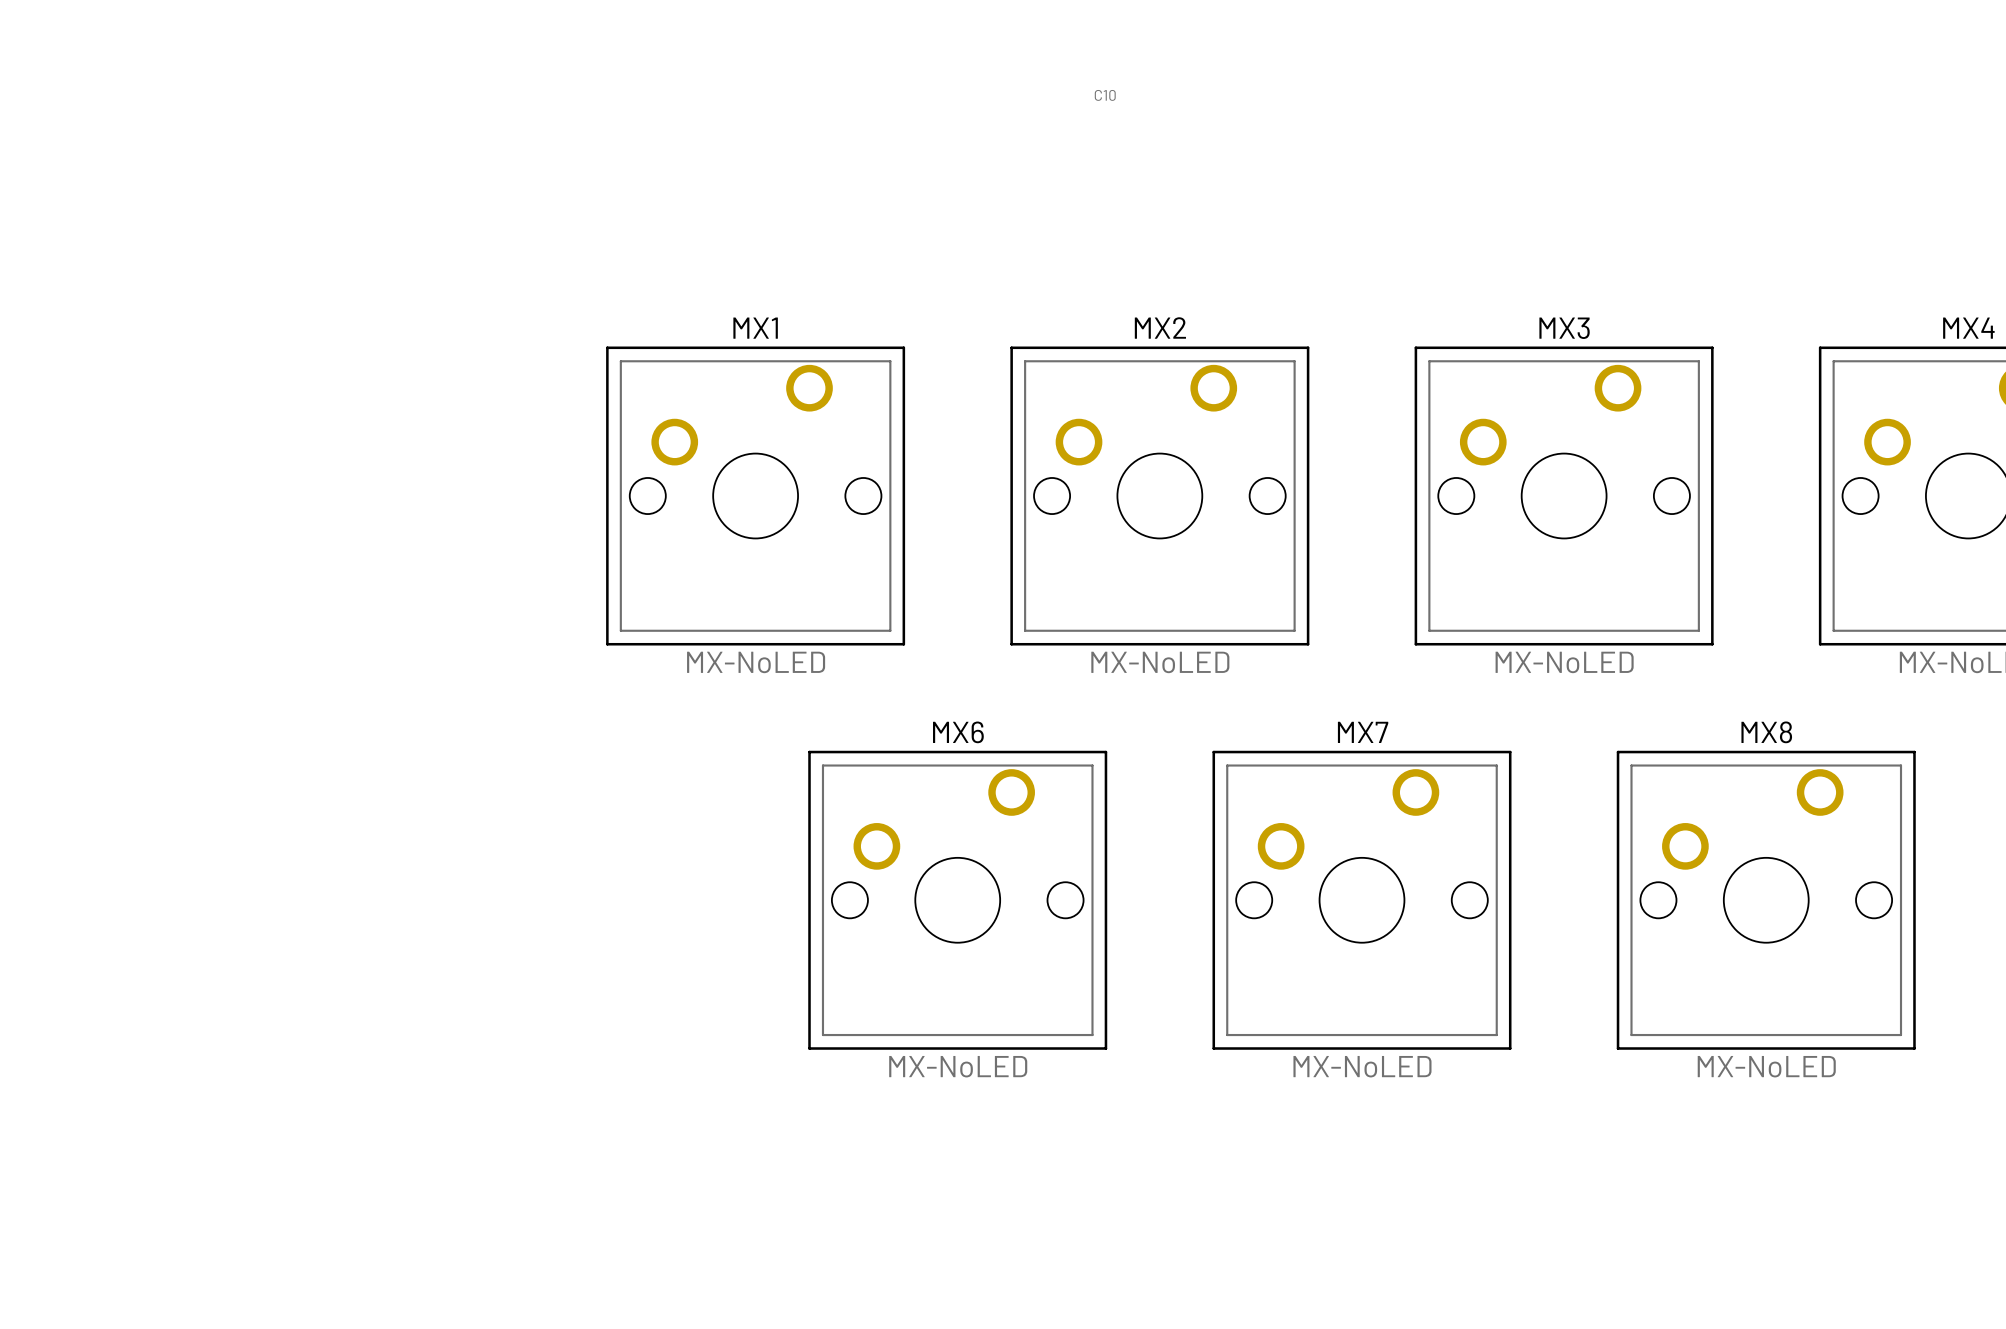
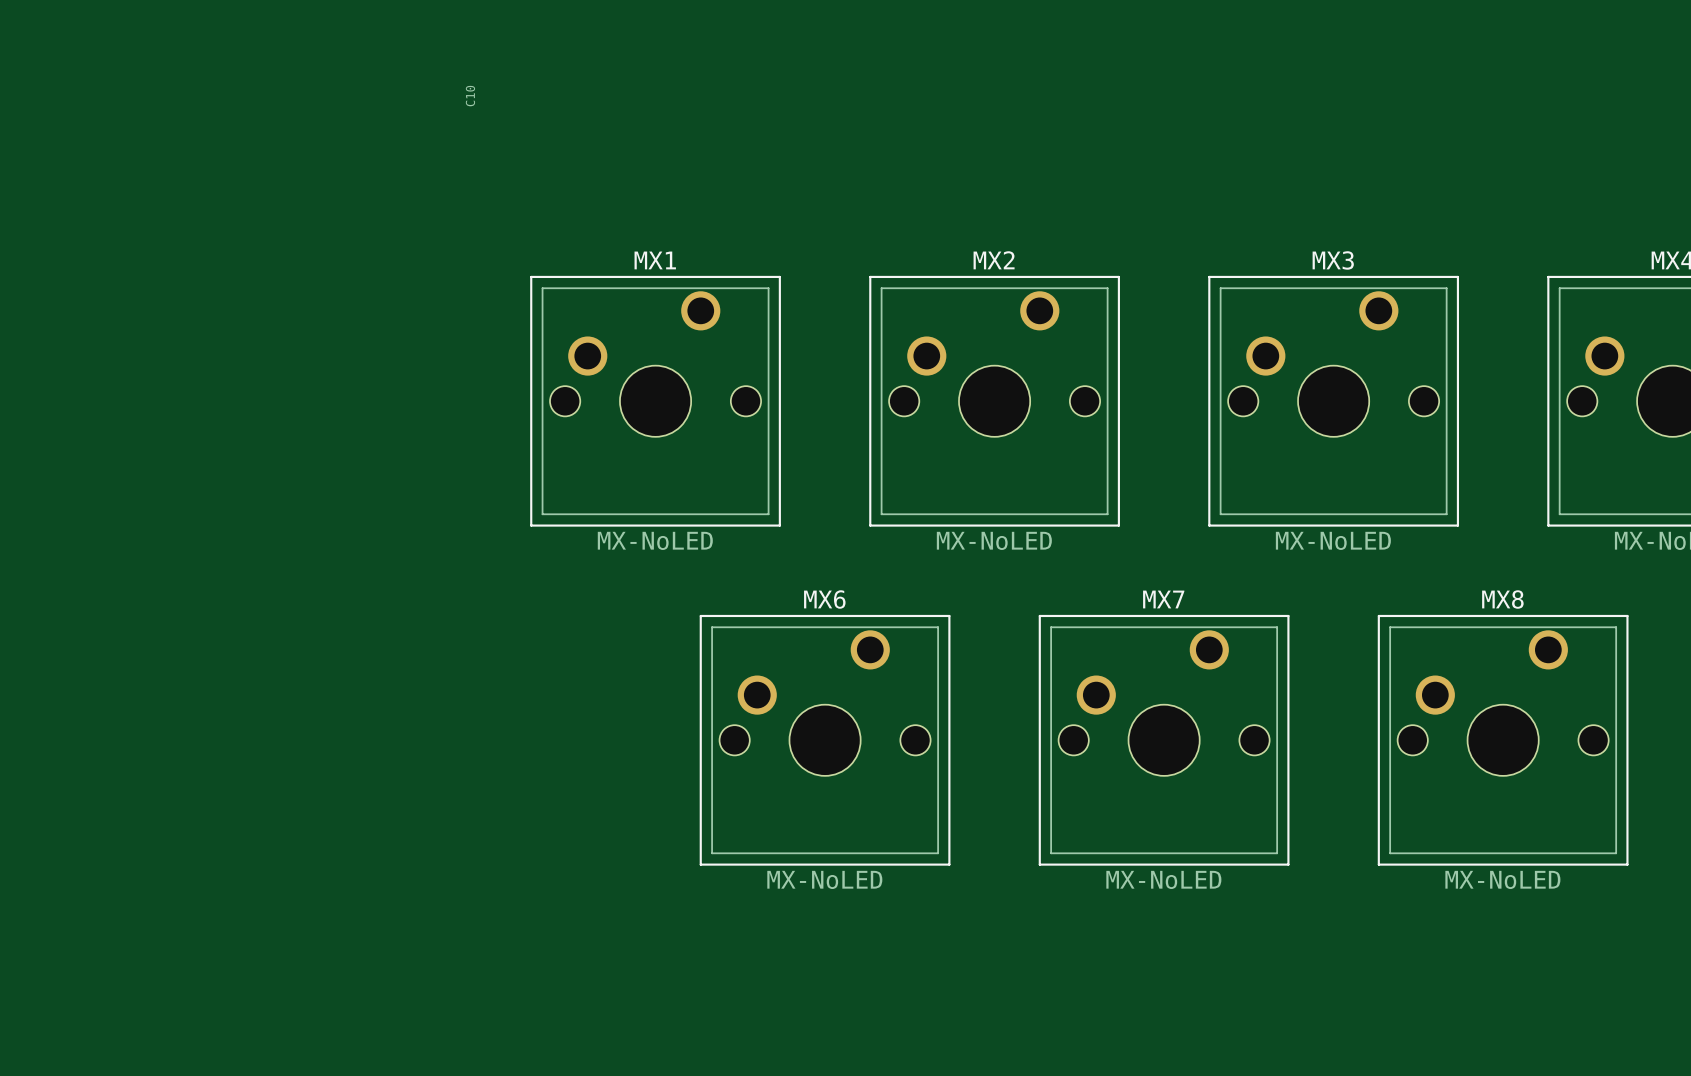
C10 position: (1105, 95) -> (470, 96)
C10 name rotation: 0° (1105, 95) -> 90° counterclockwise (470, 96)

